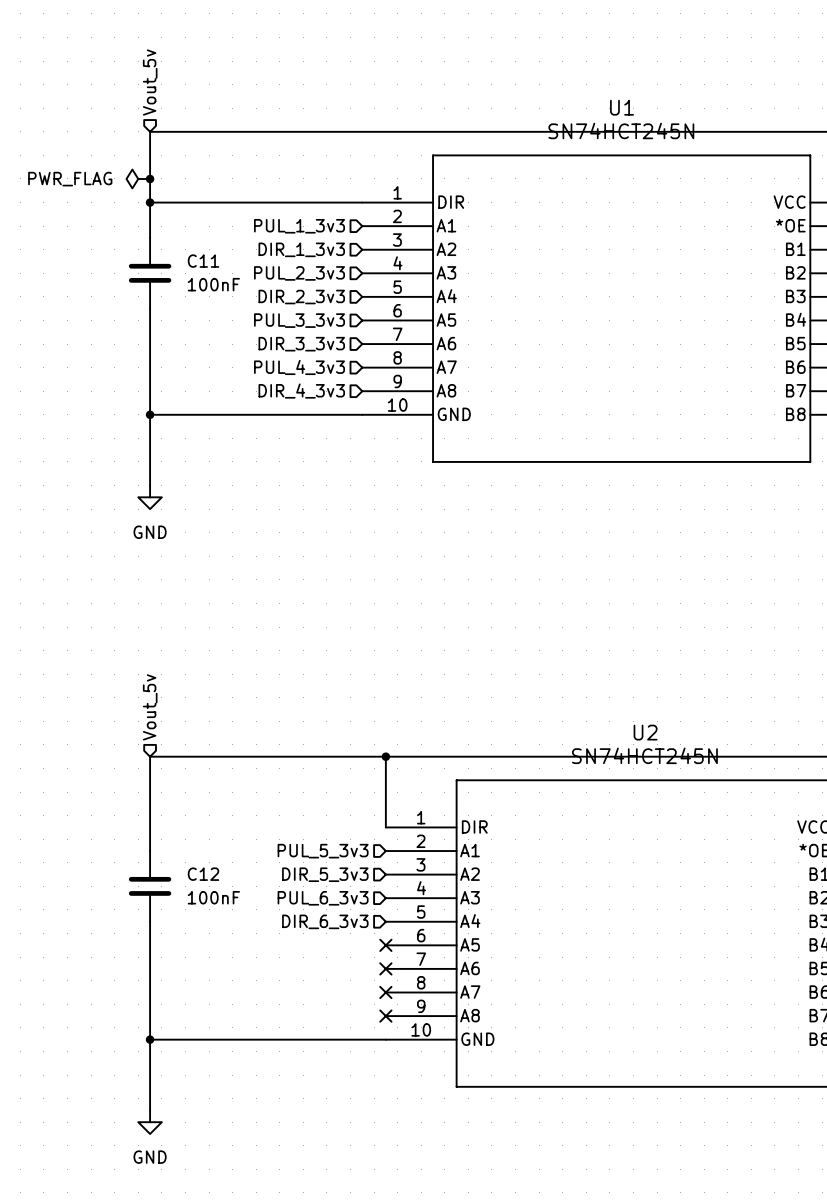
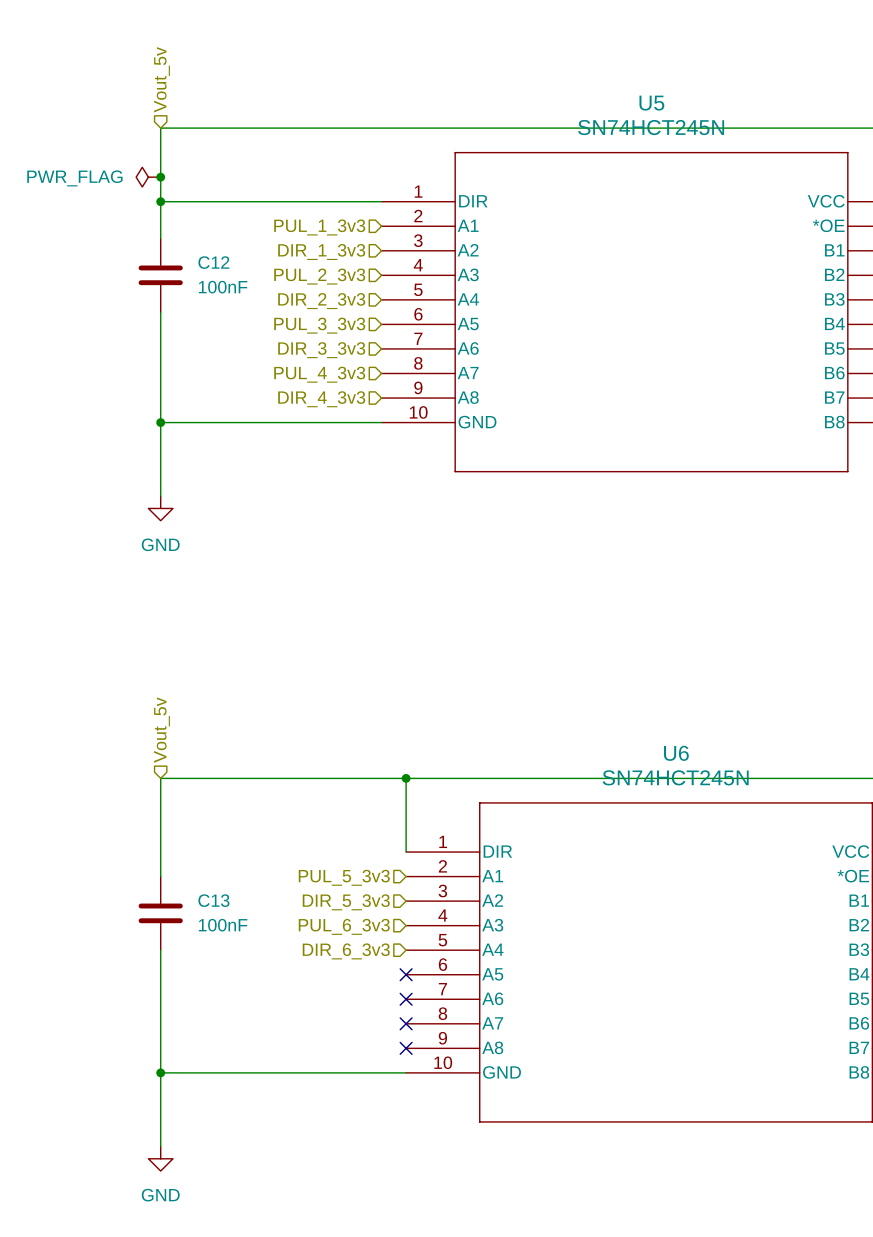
U1 name: U1 (622, 107) -> U5 (651, 103)
C11 name: C11 (203, 261) -> C12 (213, 262)
U2 name: U2 (645, 732) -> U6 (676, 753)
C12 name: C12 (203, 874) -> C13 (213, 900)

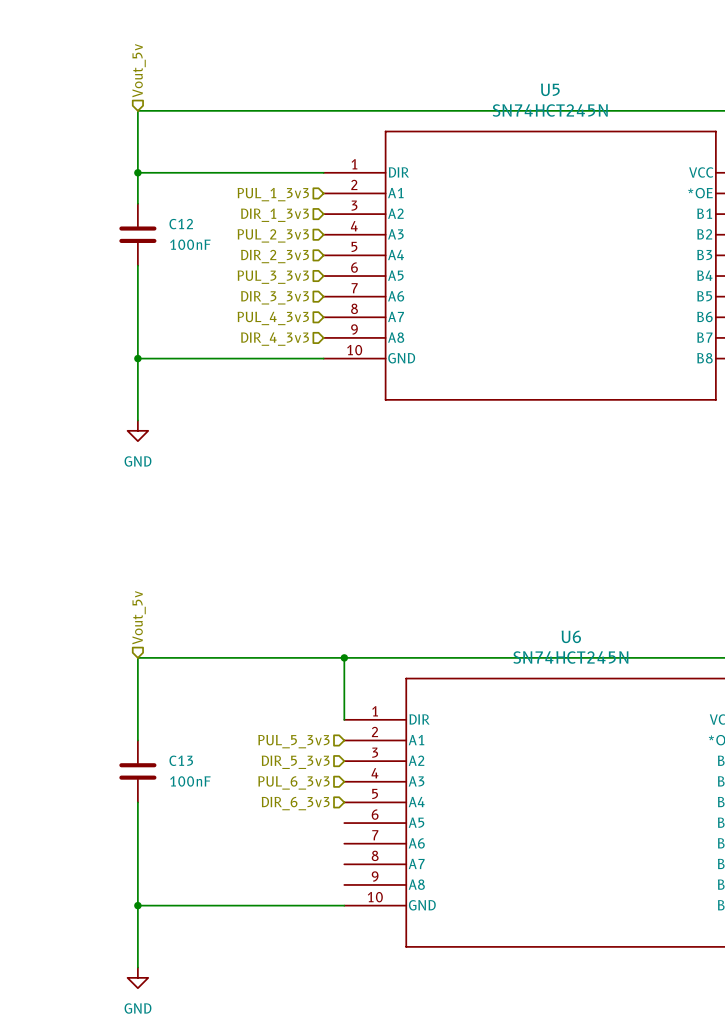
power symbol: PWR_FLAG (148, 177) -> none
junction: (160, 177) -> none
no-connect mark: (406, 974) -> none
no-connect mark: (406, 999) -> none
no-connect mark: (406, 1023) -> none
no-connect mark: (406, 1048) -> none

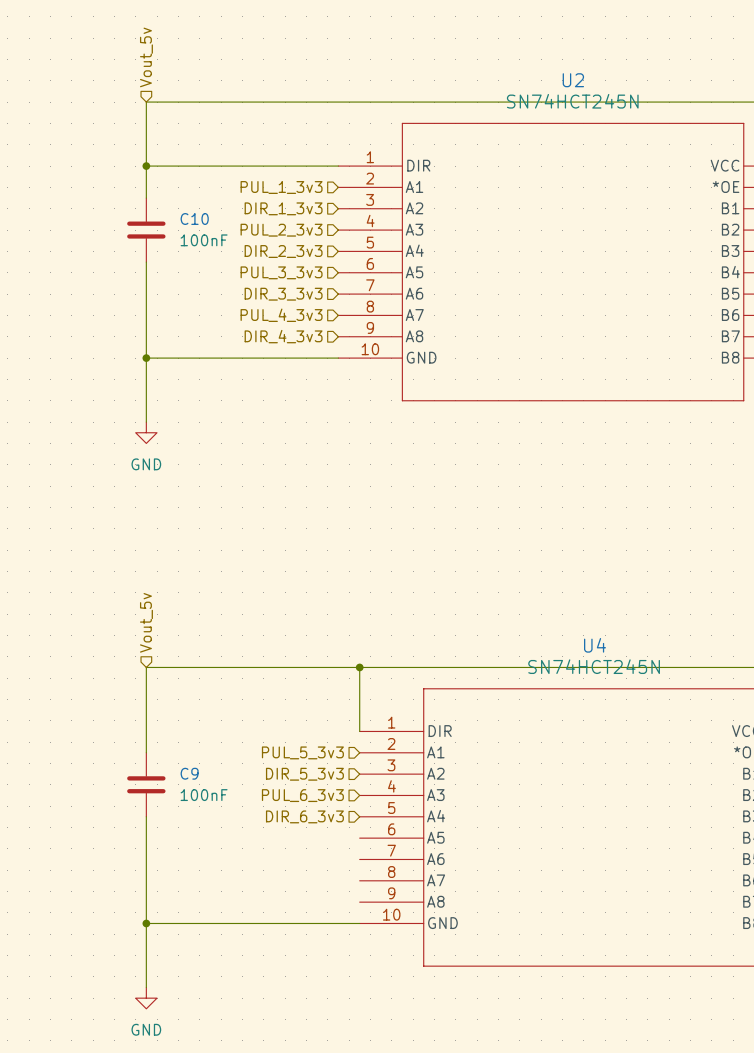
U5 name: U5 (550, 89) -> U2 (573, 80)
C12 name: C12 (181, 224) -> C10 (194, 219)
U6 name: U6 (571, 636) -> U4 (595, 645)
C13 name: C13 (181, 760) -> C9 (189, 773)

